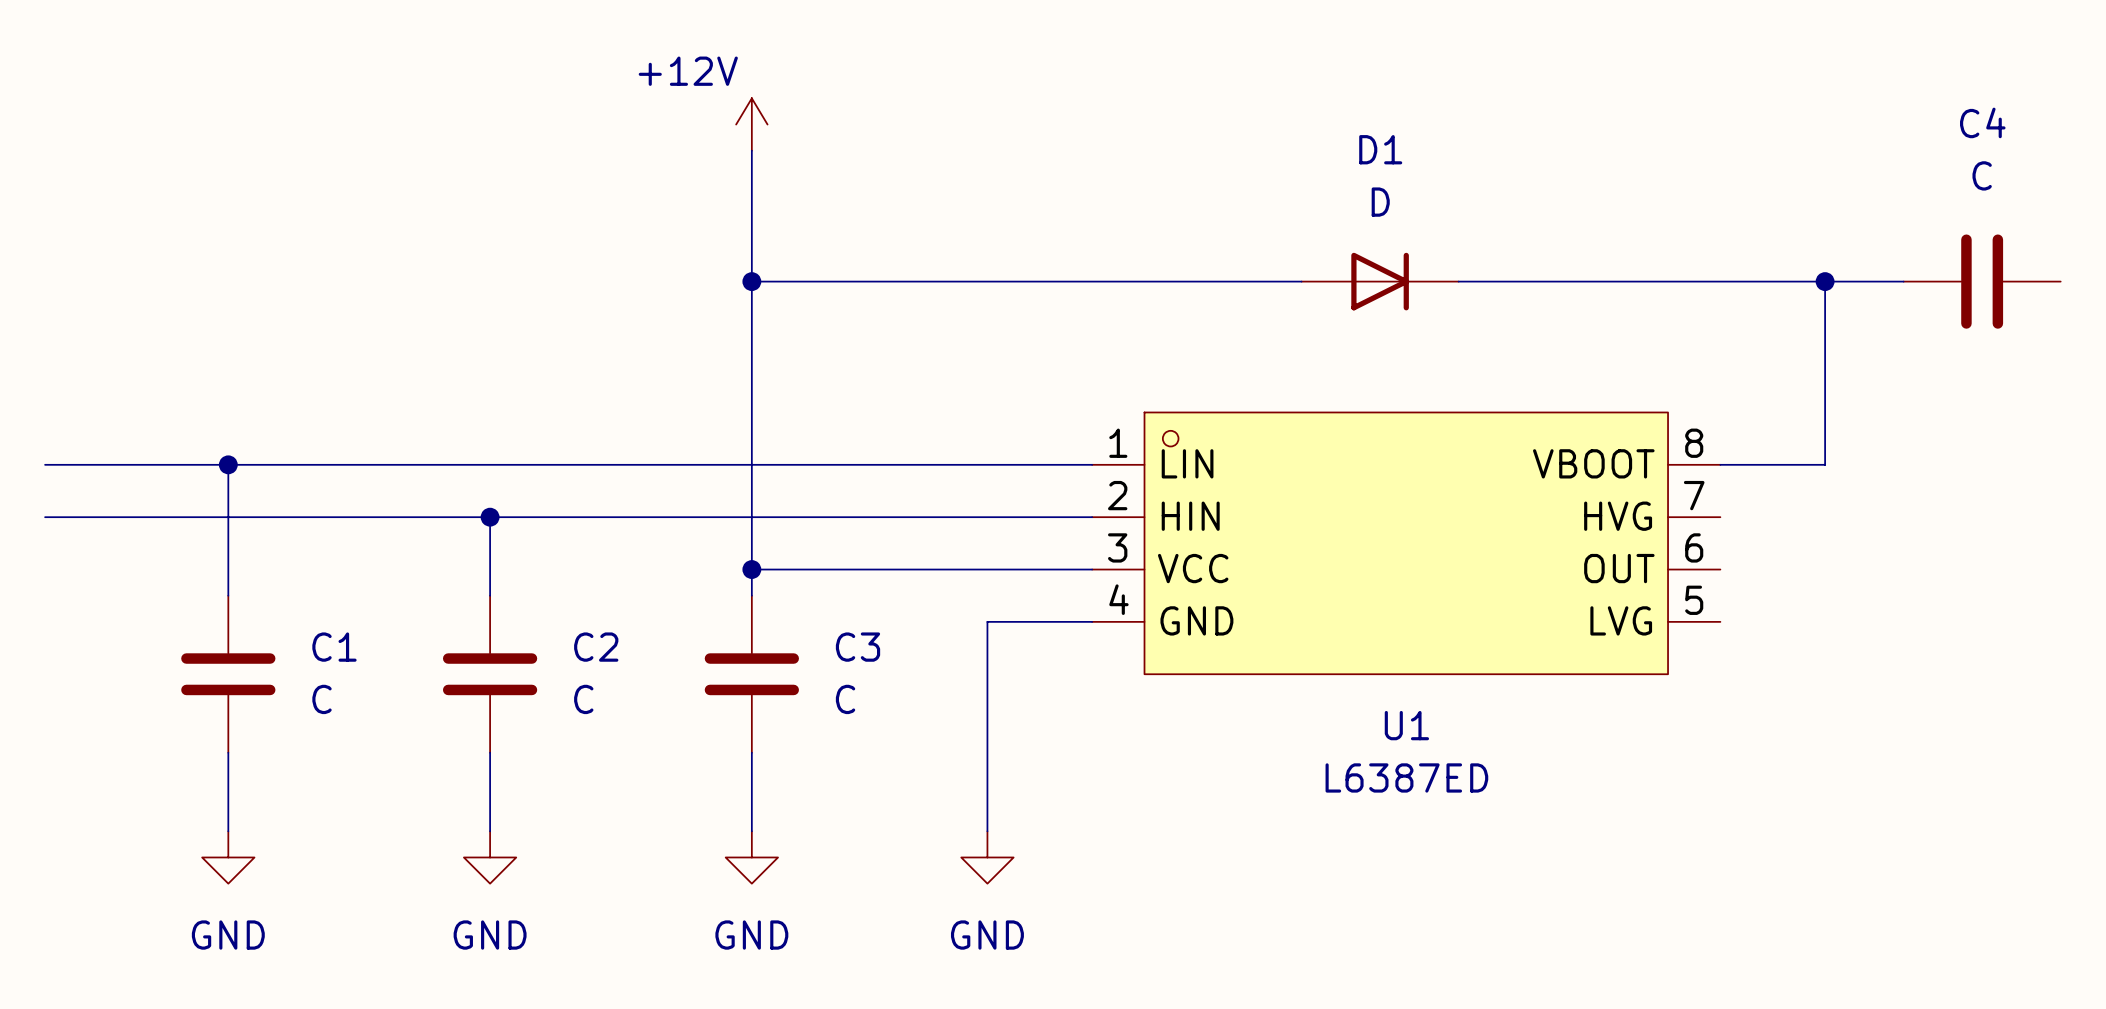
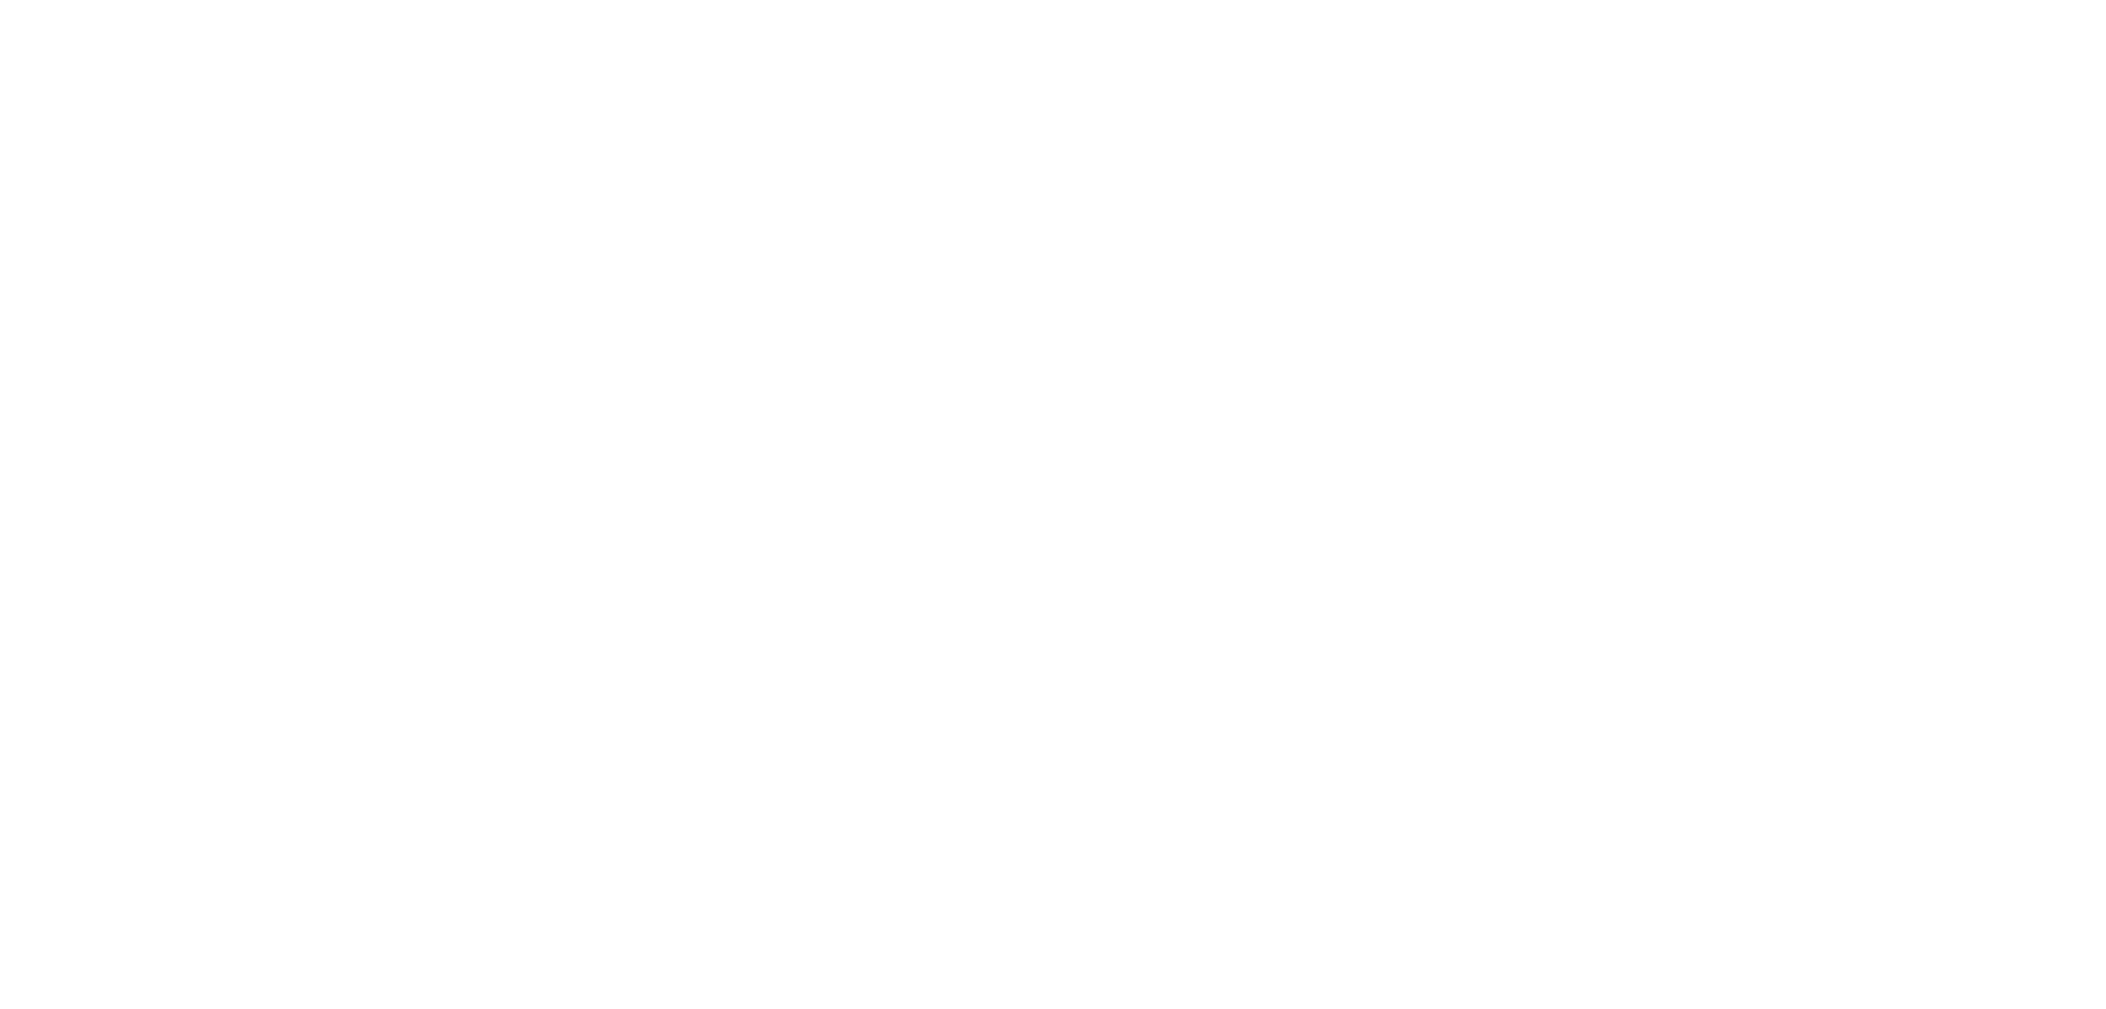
power symbol: +12V (751, 124) -> none
wire: (751, 150) (751, 595) -> none
wire: (751, 281) (1301, 281) -> none
junction: (751, 281) -> none
D1: D (1380, 281) -> none
wire: (1458, 281) (1903, 281) -> none
wire: (1825, 281) (1825, 464) (1720, 464) -> none
junction: (1825, 281) -> none
C4: C (1982, 281) -> none
wire: (45, 464) (1092, 464) -> none
wire: (228, 464) (228, 595) -> none
junction: (228, 464) -> none
wire: (45, 517) (1092, 517) -> none
wire: (490, 517) (490, 595) -> none
junction: (490, 517) -> none
U1: L6387ED (1406, 543) -> none
wire: (751, 569) (1092, 569) -> none
junction: (751, 569) -> none
wire: (1092, 621) (987, 621) (987, 831) -> none
C1: C (228, 674) -> none
C2: C (490, 674) -> none
C3: C (751, 674) -> none
wire: (228, 752) (228, 831) -> none
wire: (490, 752) (490, 831) -> none
wire: (751, 752) (751, 831) -> none
power symbol: GND (228, 857) -> none
power symbol: GND (490, 857) -> none
power symbol: GND (751, 857) -> none
power symbol: GND (987, 857) -> none

